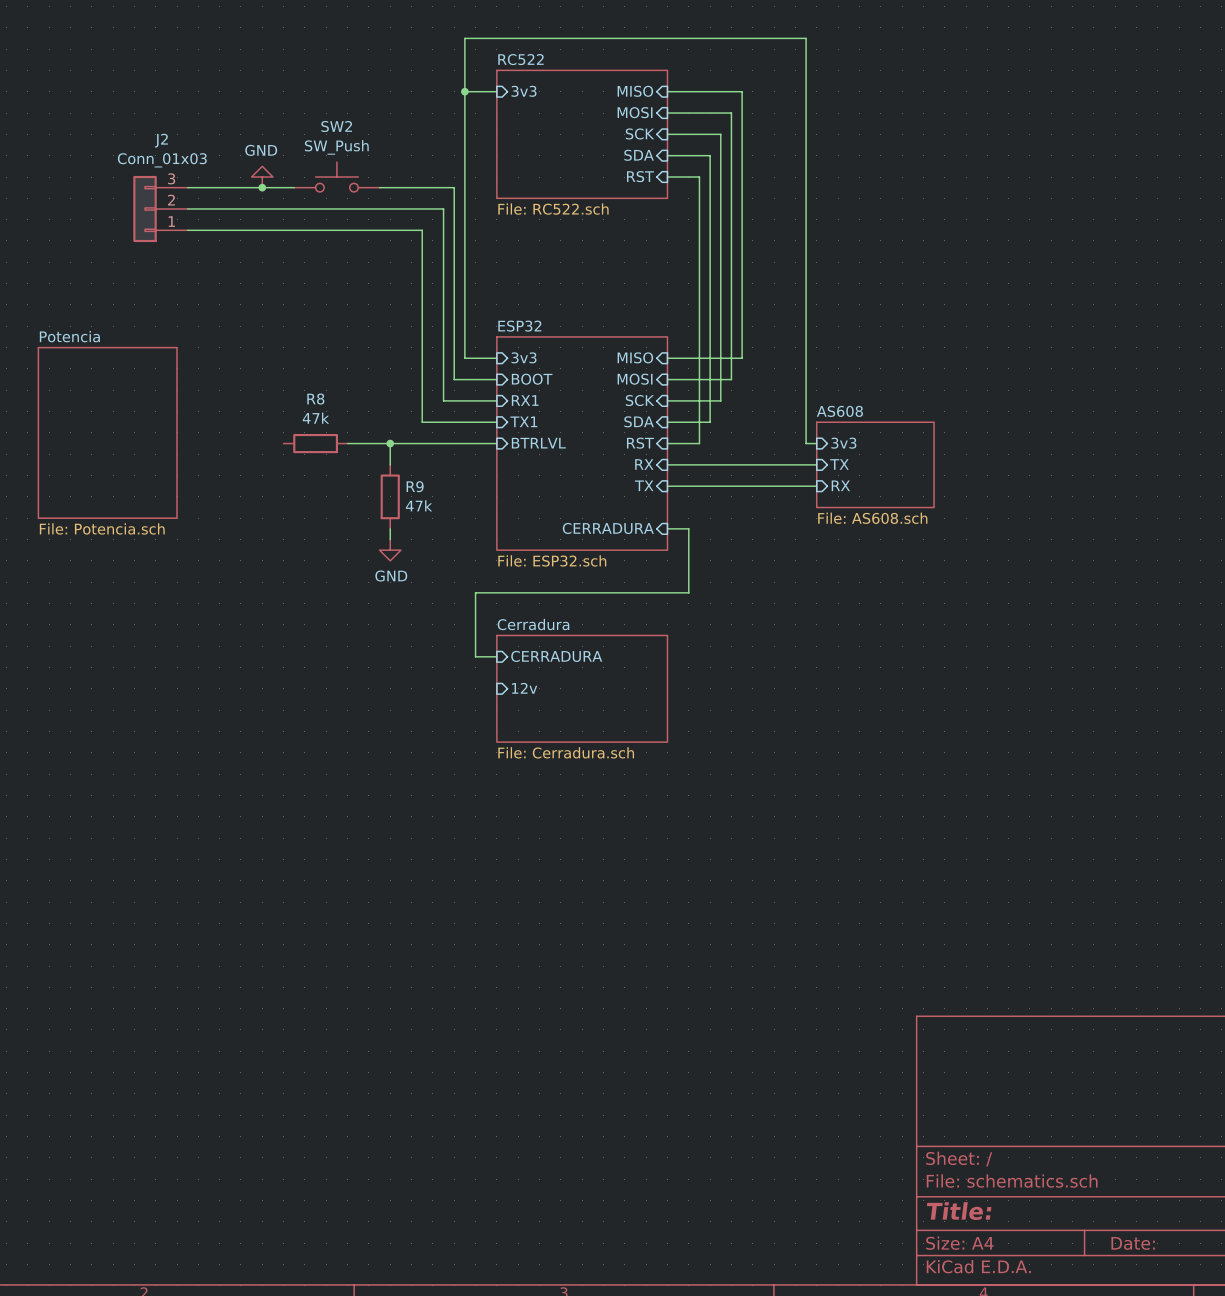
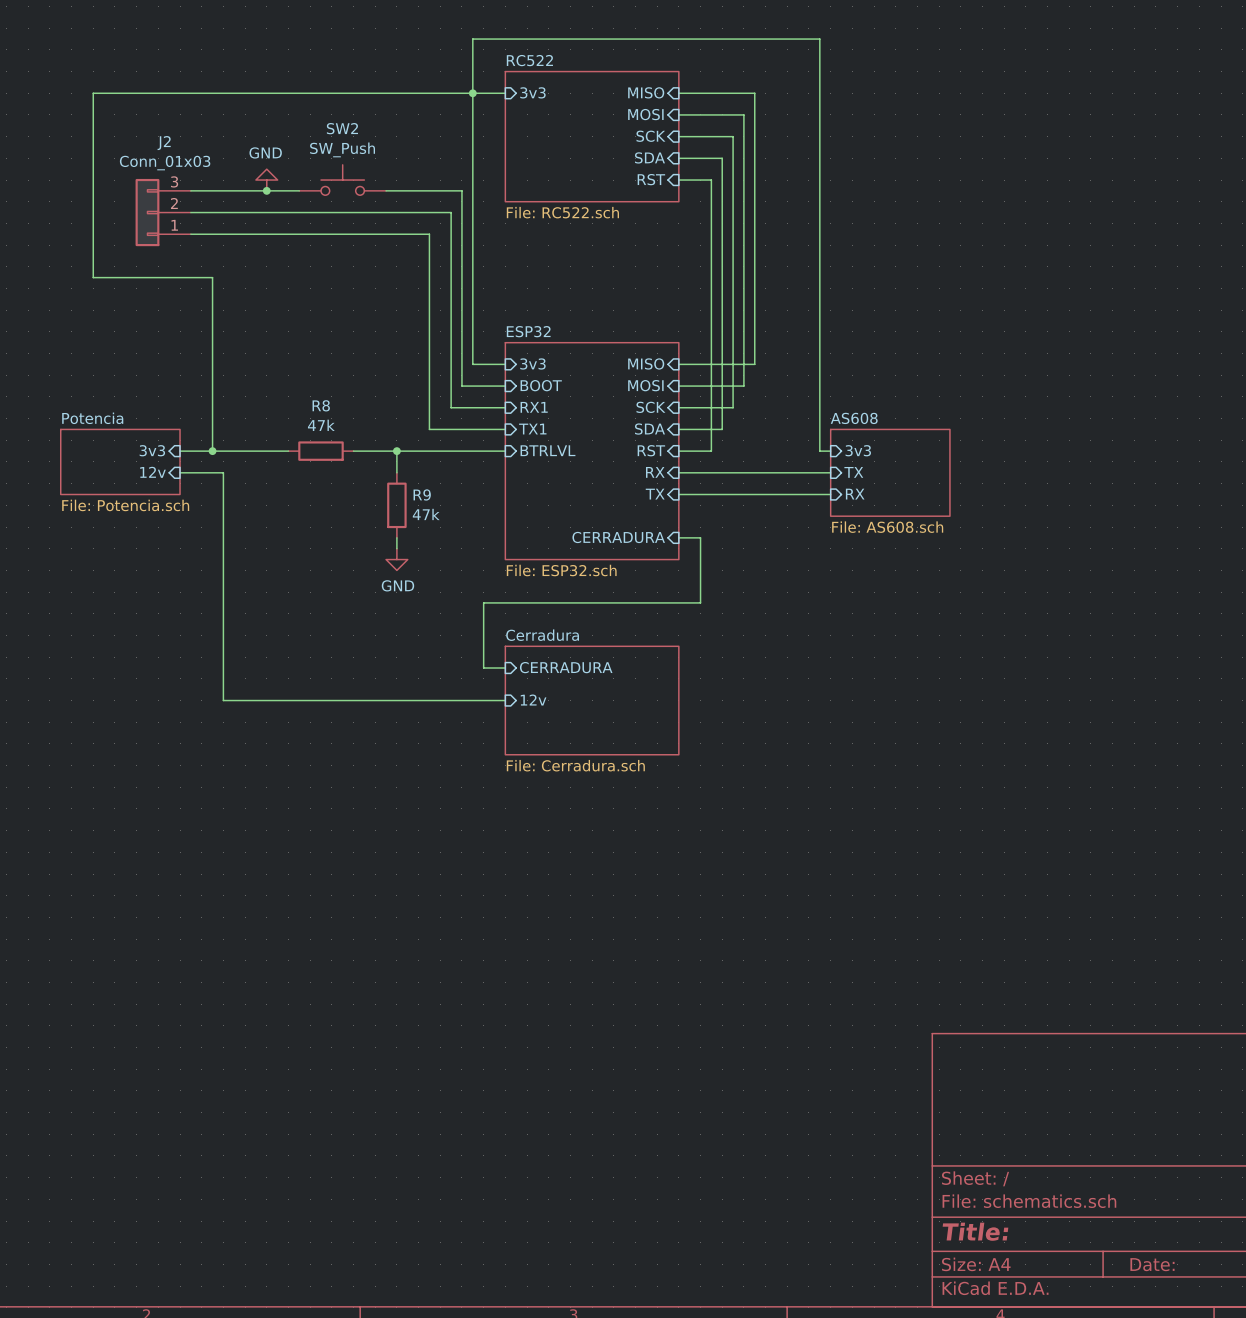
wire: none -> (472, 93) (93, 93) (93, 277) (212, 277) (212, 451)
sheet Potencia: File: Potencia.sch (107, 432) -> none
sheet pin: none -> 3v3 (152, 450)
wire: none -> (180, 451) (288, 451)
junction: none -> (212, 451)
sheet Potencia: none -> File: Potencia.sch (120, 461)
sheet pin: none -> 12v (152, 472)
wire: none -> (180, 472) (223, 472) (223, 700) (505, 700)

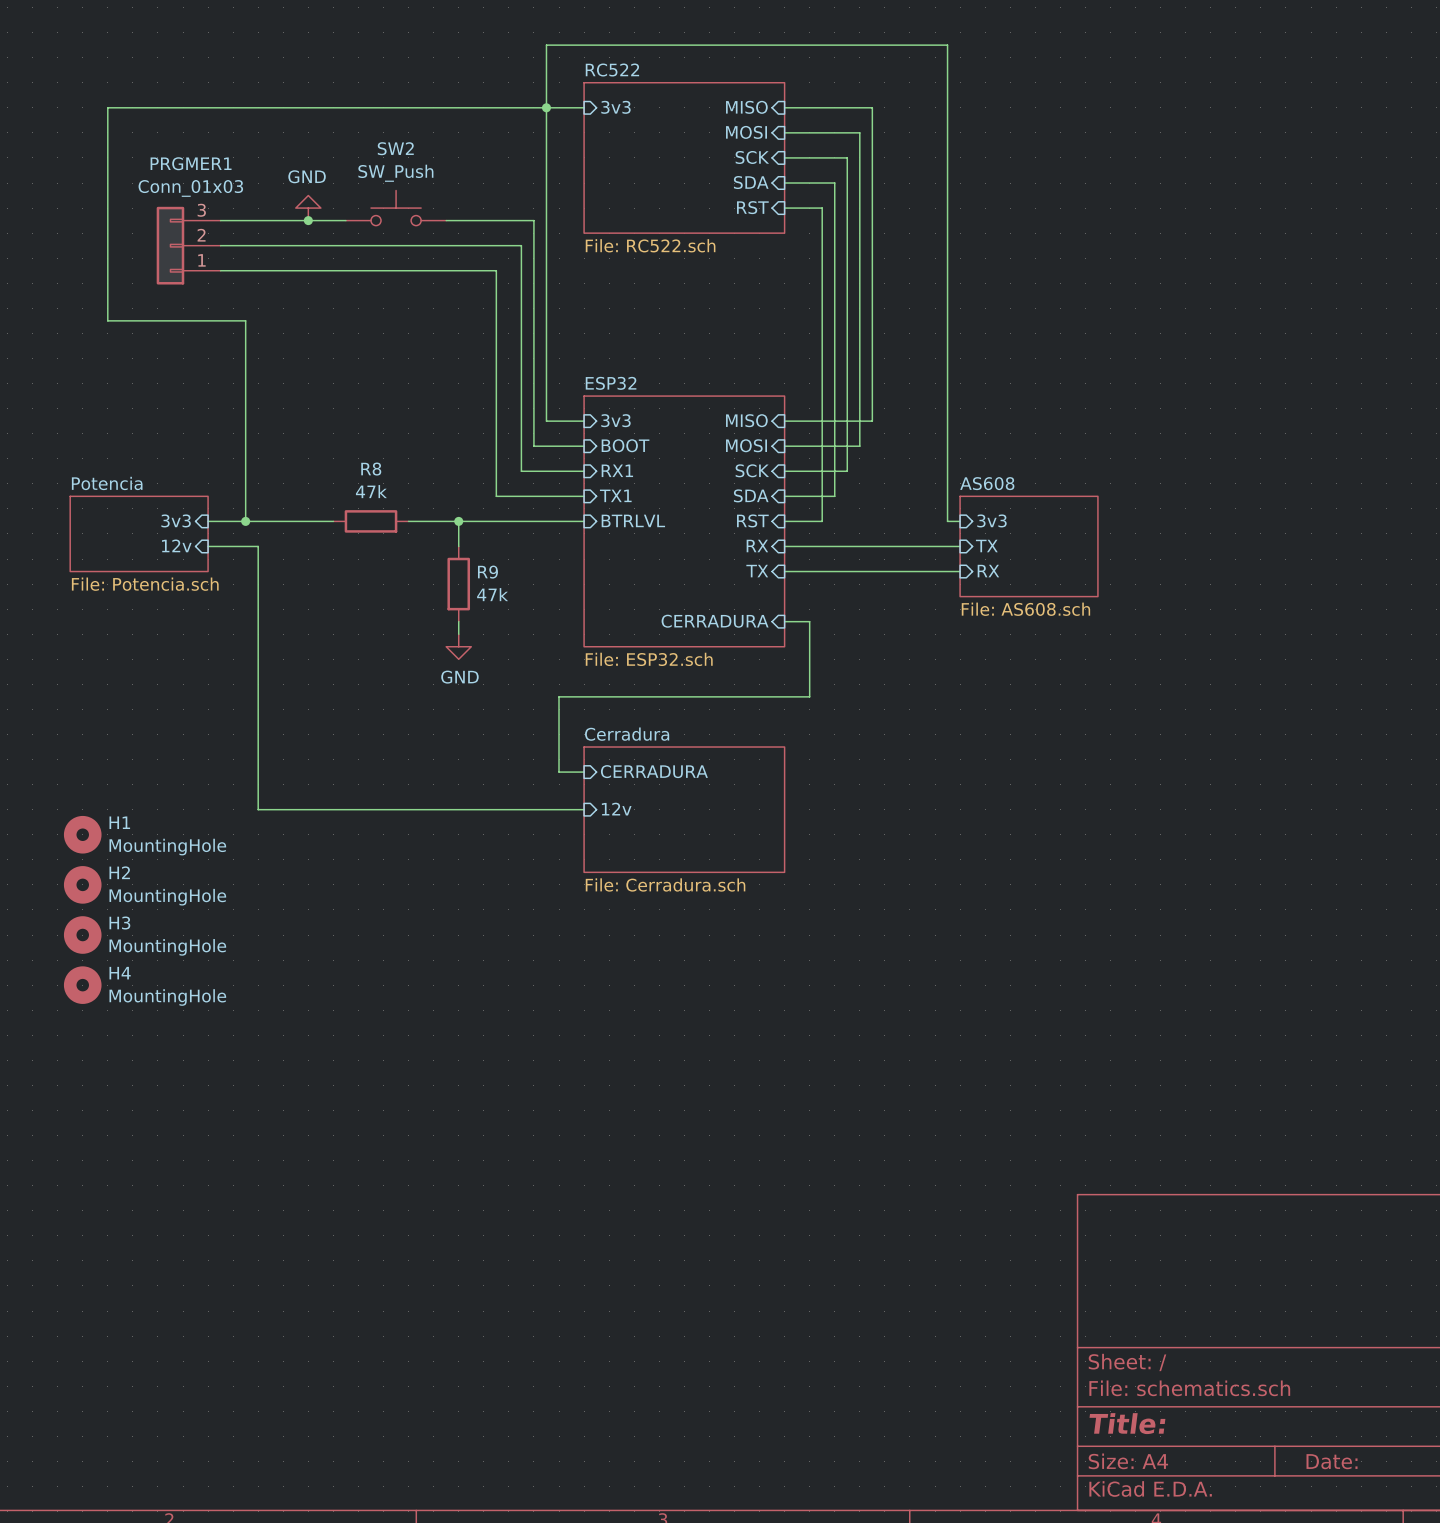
J2 name: J2 (164, 143) -> PRGMER1 (191, 163)
H1: none -> MountingHole (82, 834)
H2: none -> MountingHole (82, 884)
H3: none -> MountingHole (82, 935)
H4: none -> MountingHole (82, 985)

